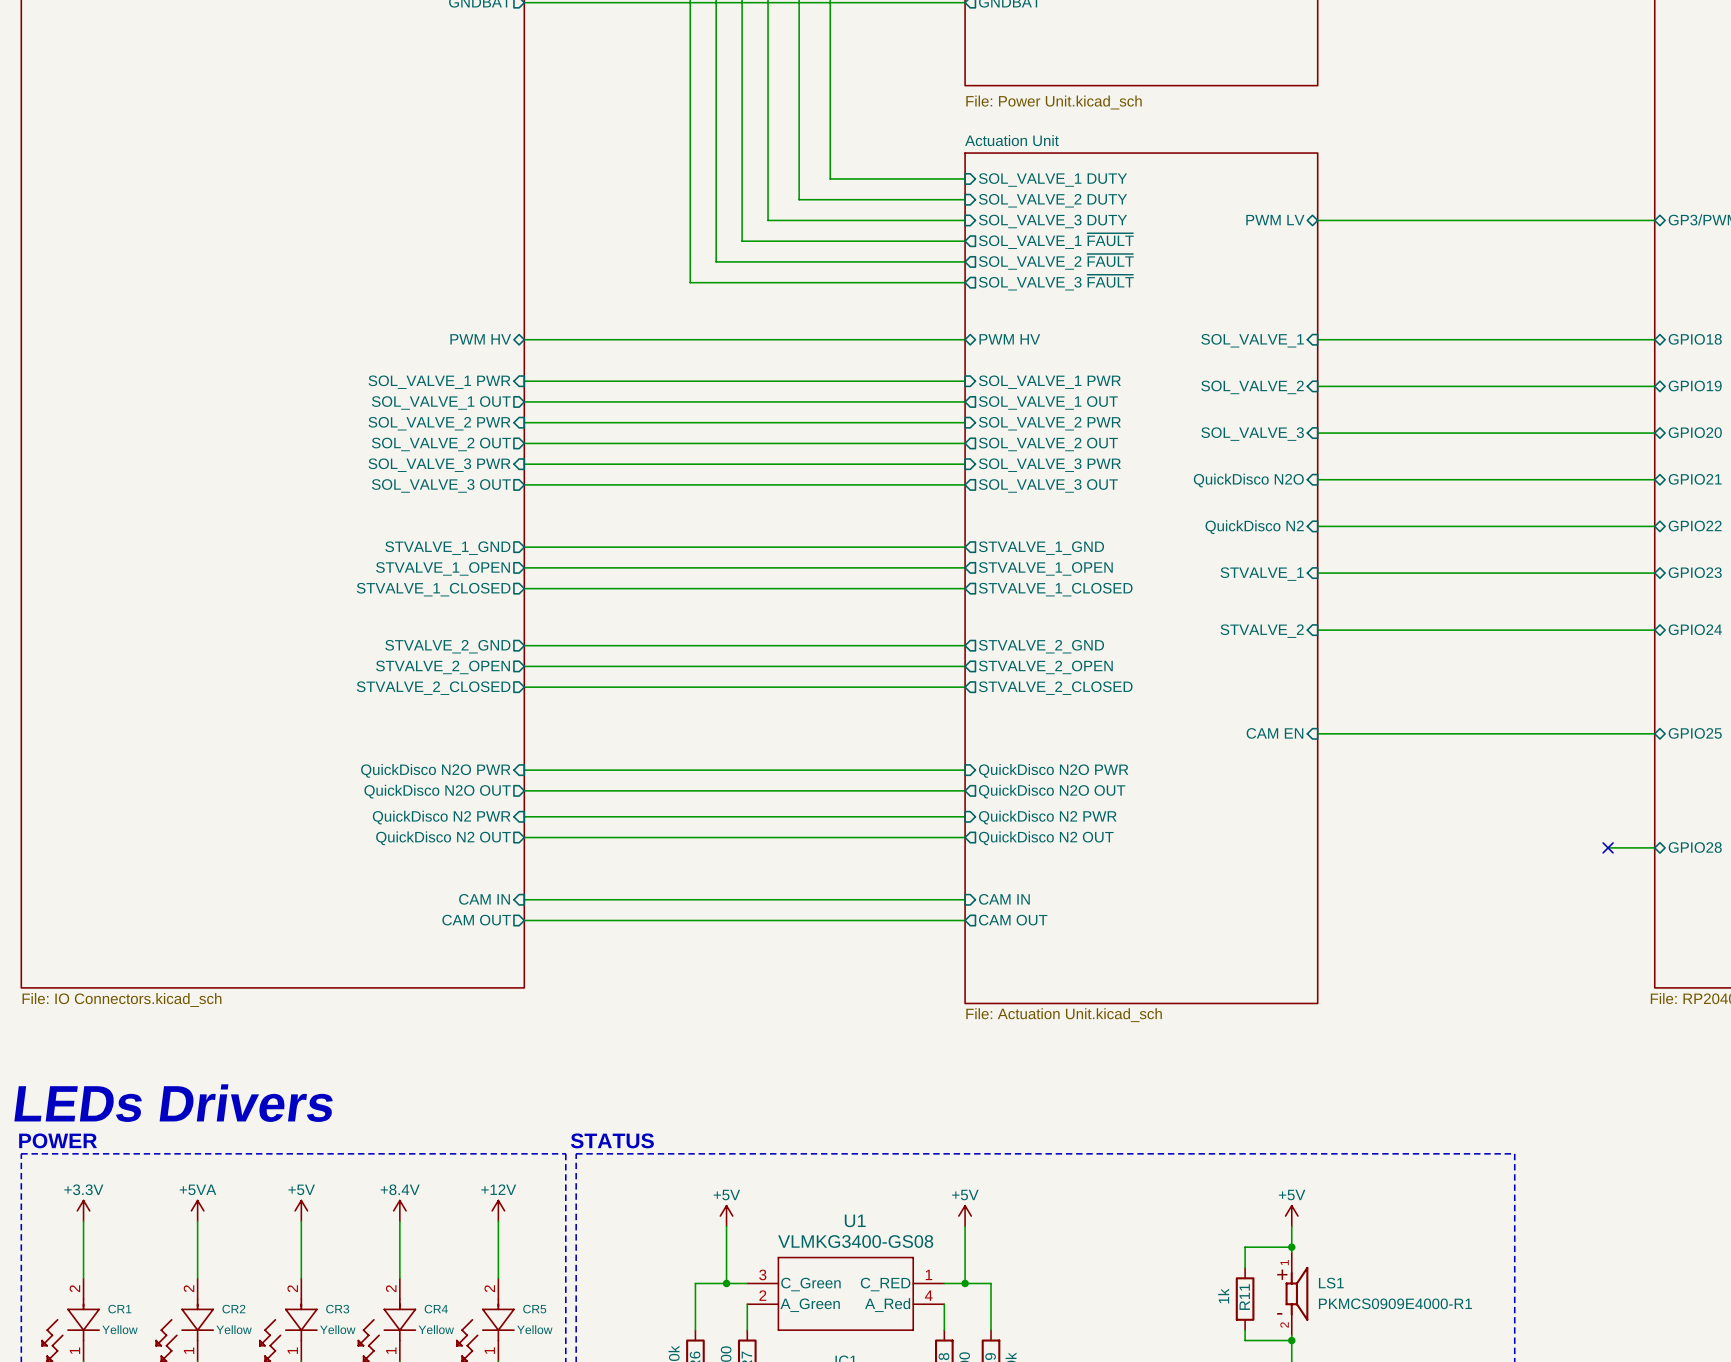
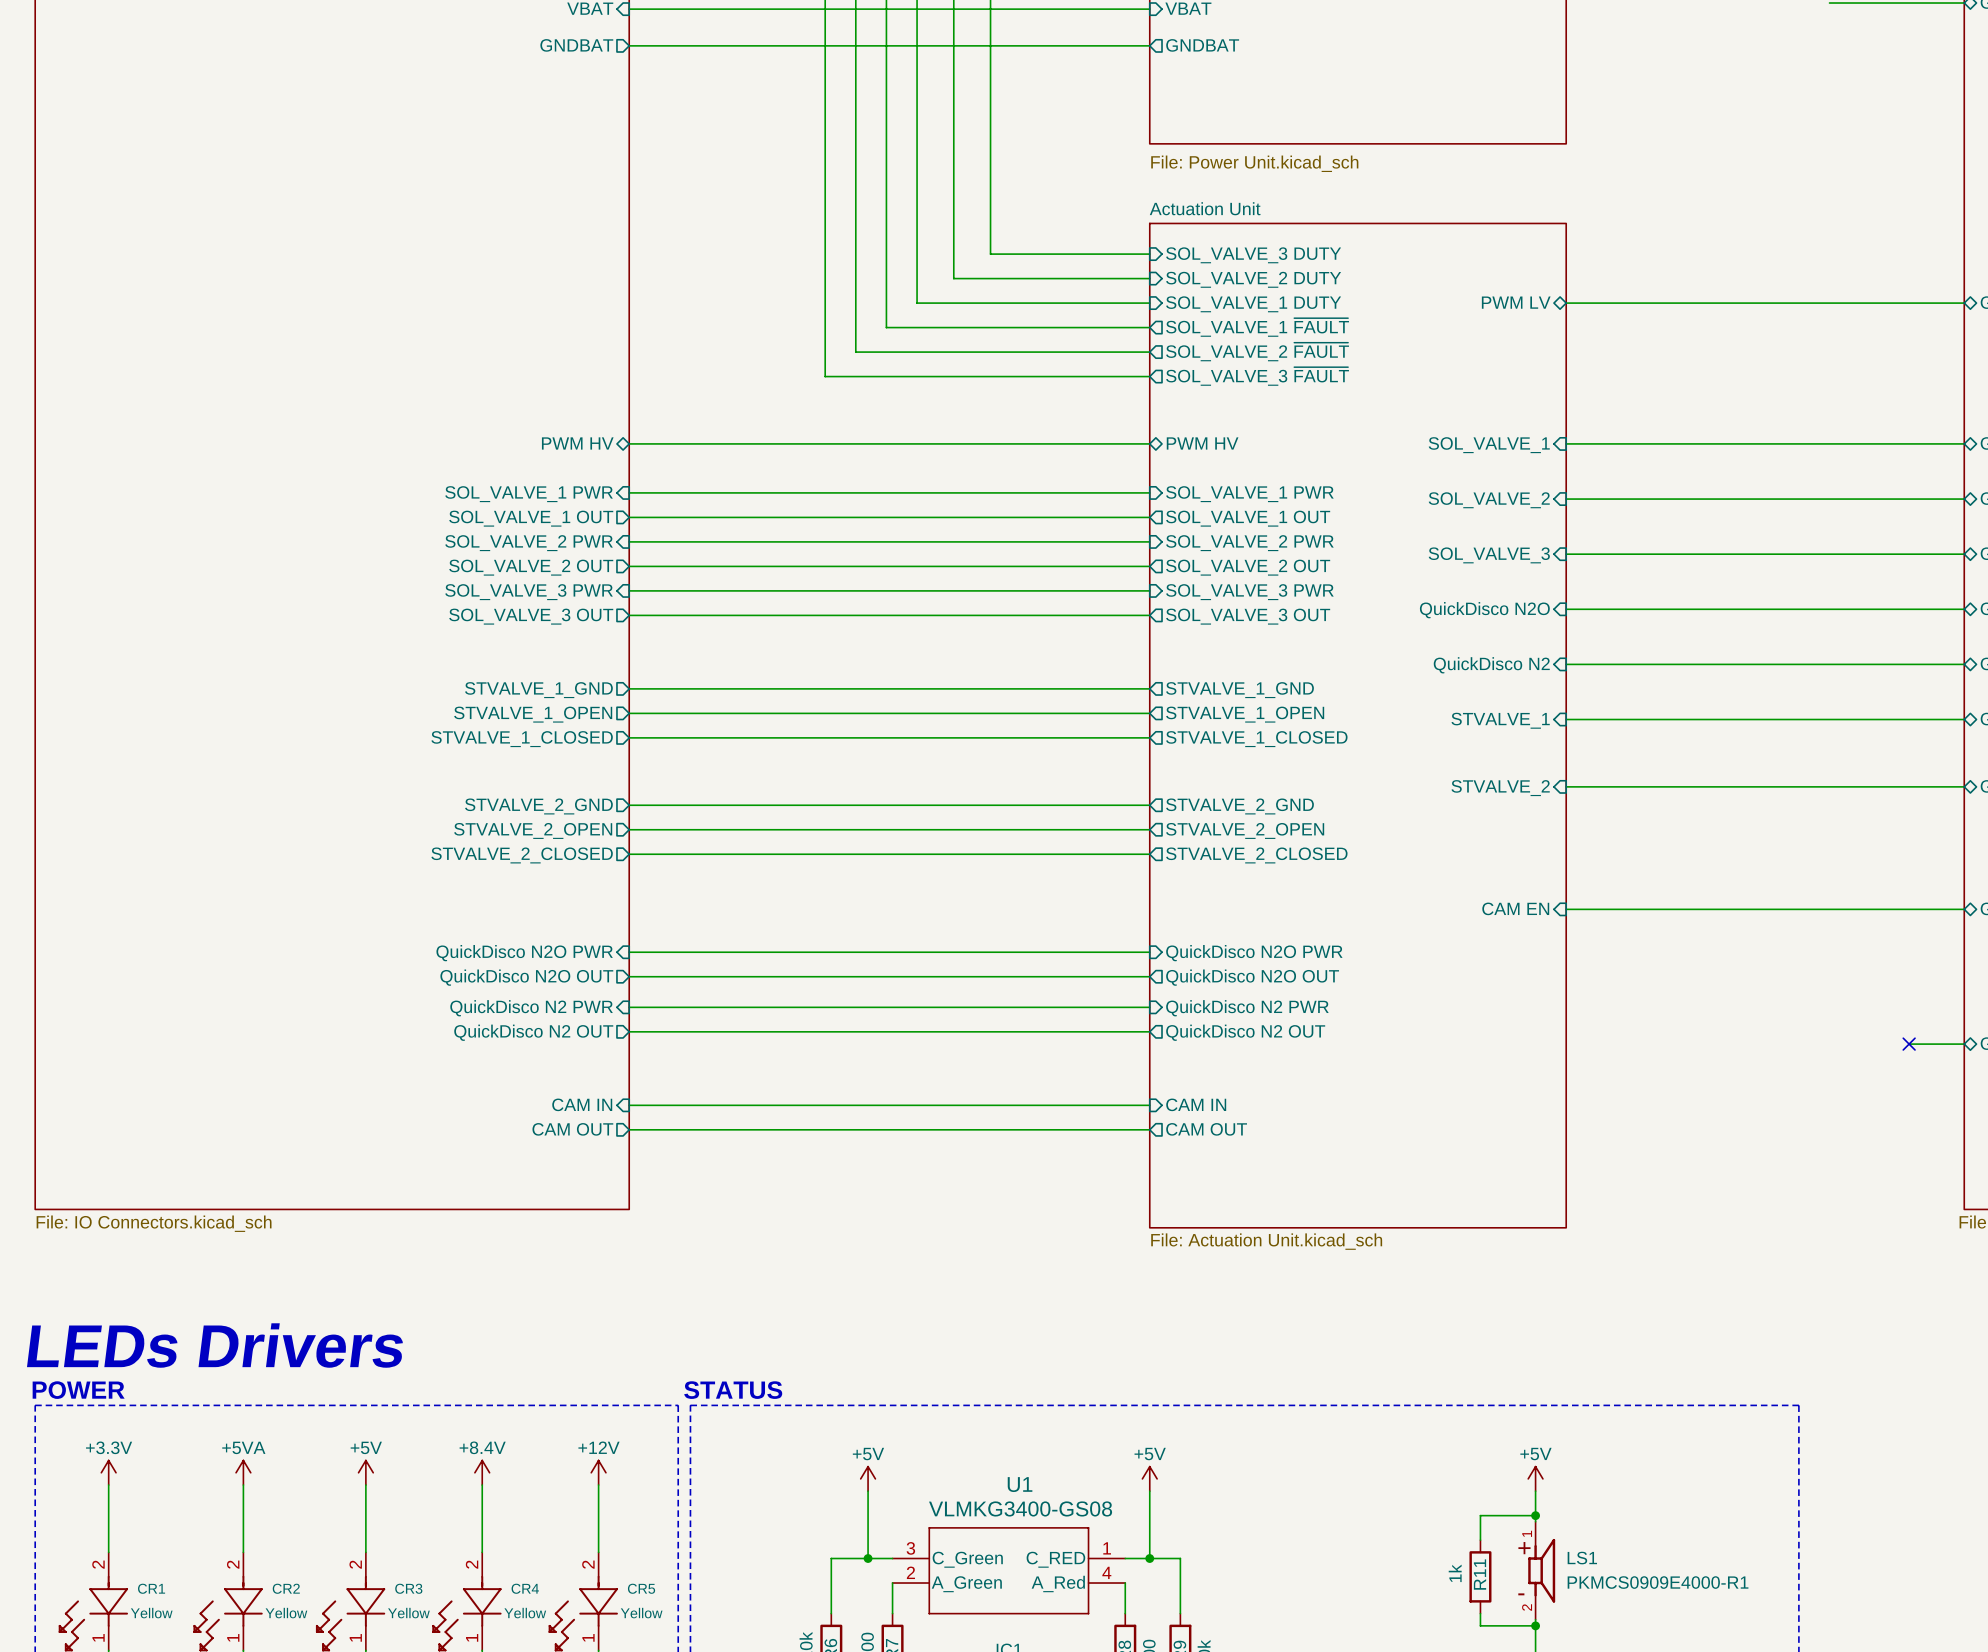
sheet pin: SOL_VALVE_1 DUTY (1053, 180) -> SOL_VALVE_3 DUTY (1253, 255)
sheet pin: SOL_VALVE_3 DUTY (1053, 221) -> SOL_VALVE_1 DUTY (1253, 304)

